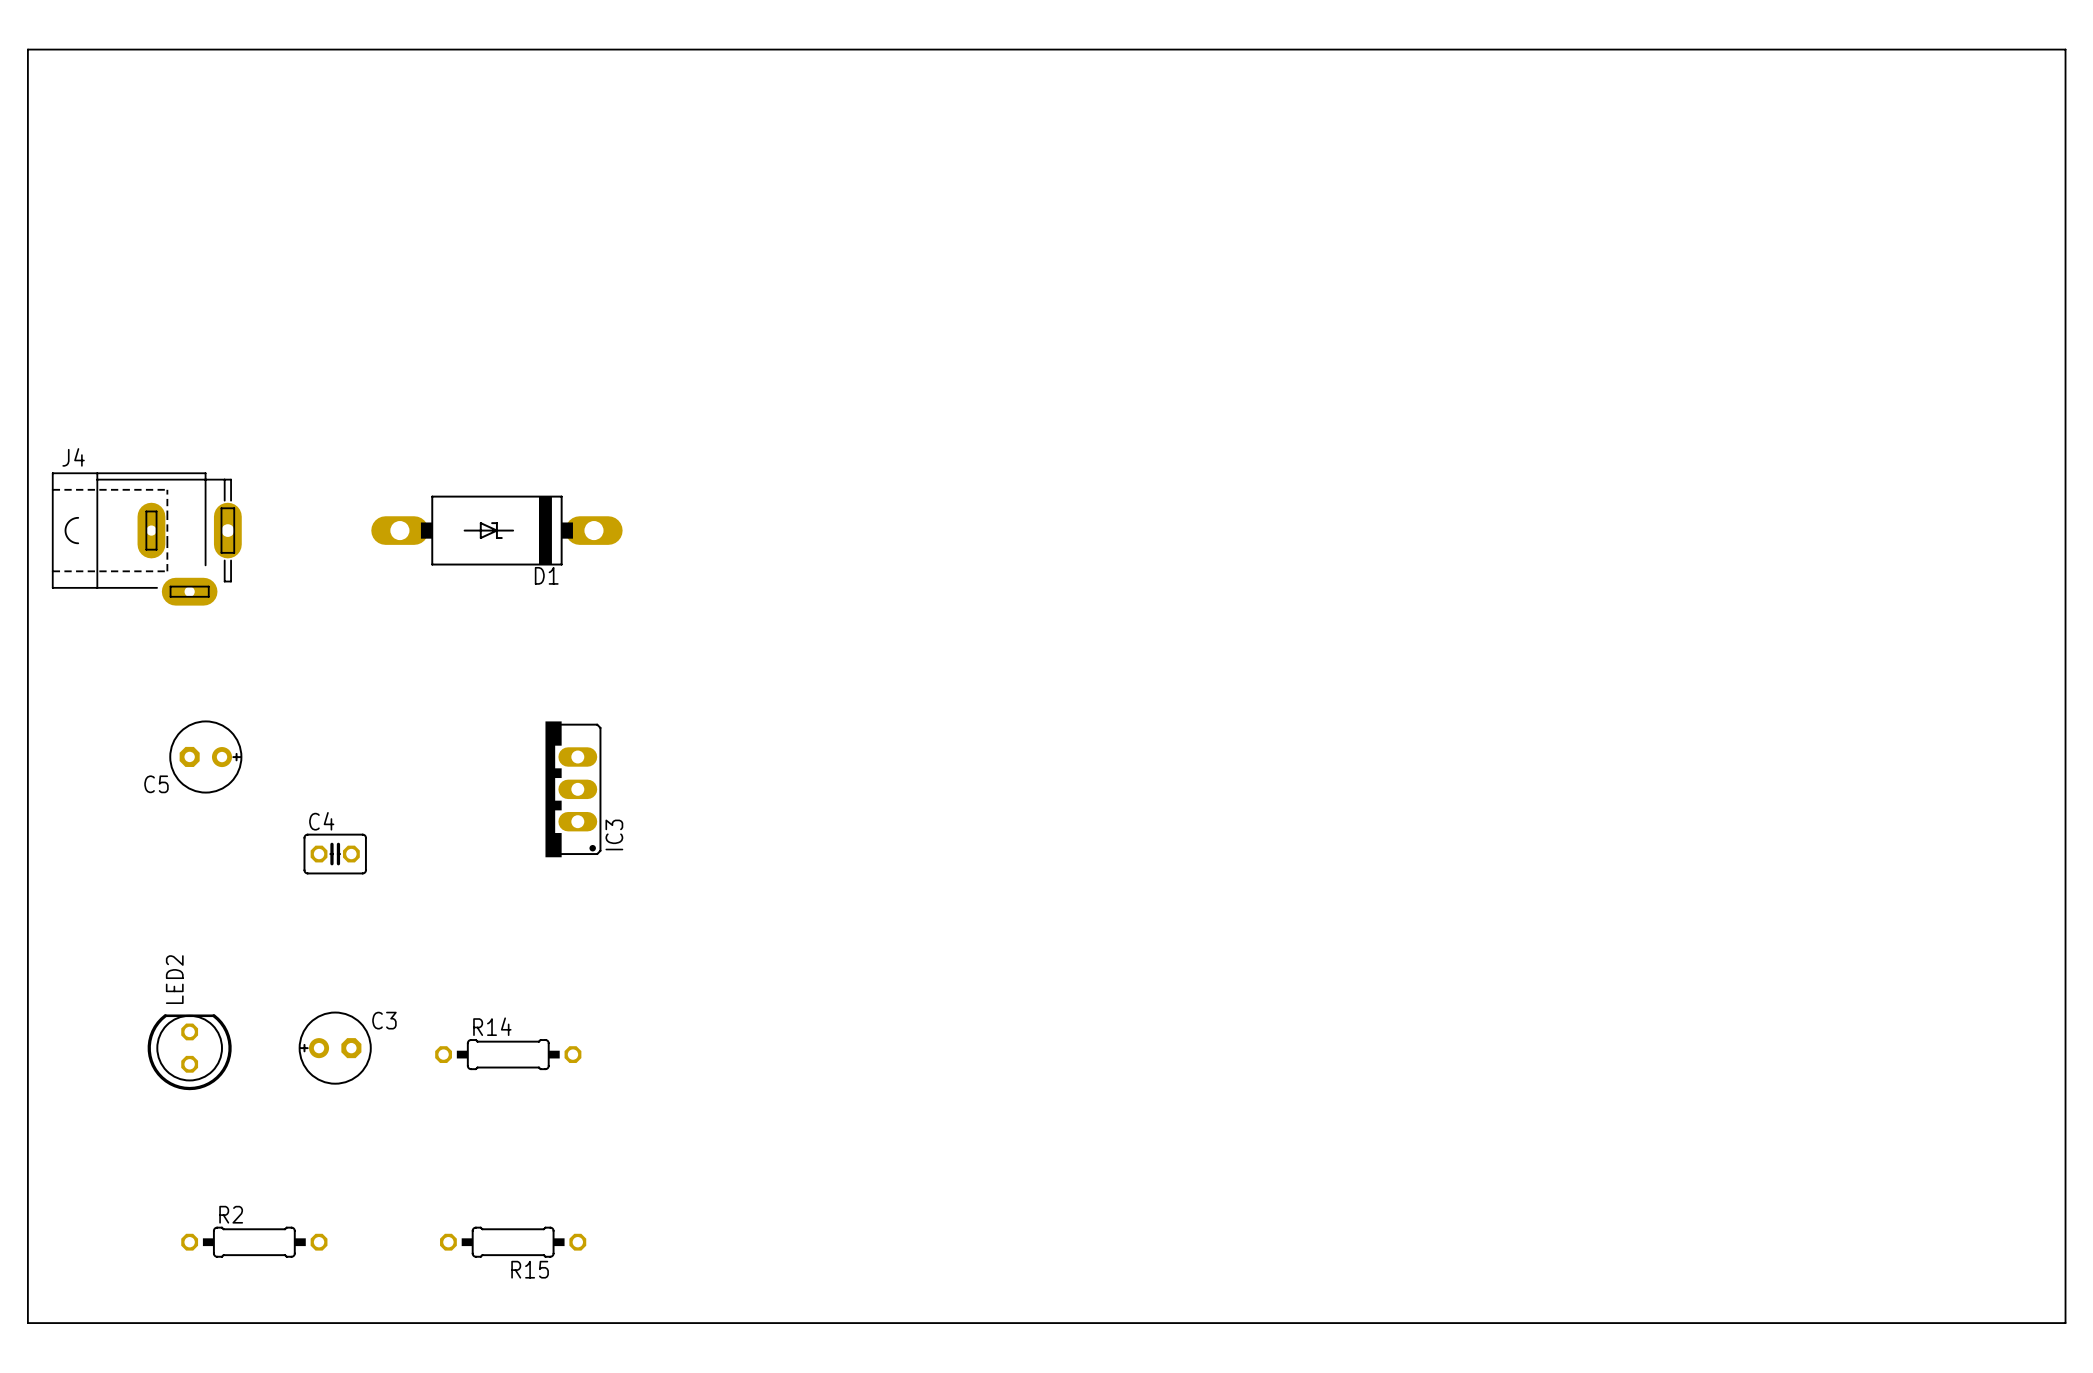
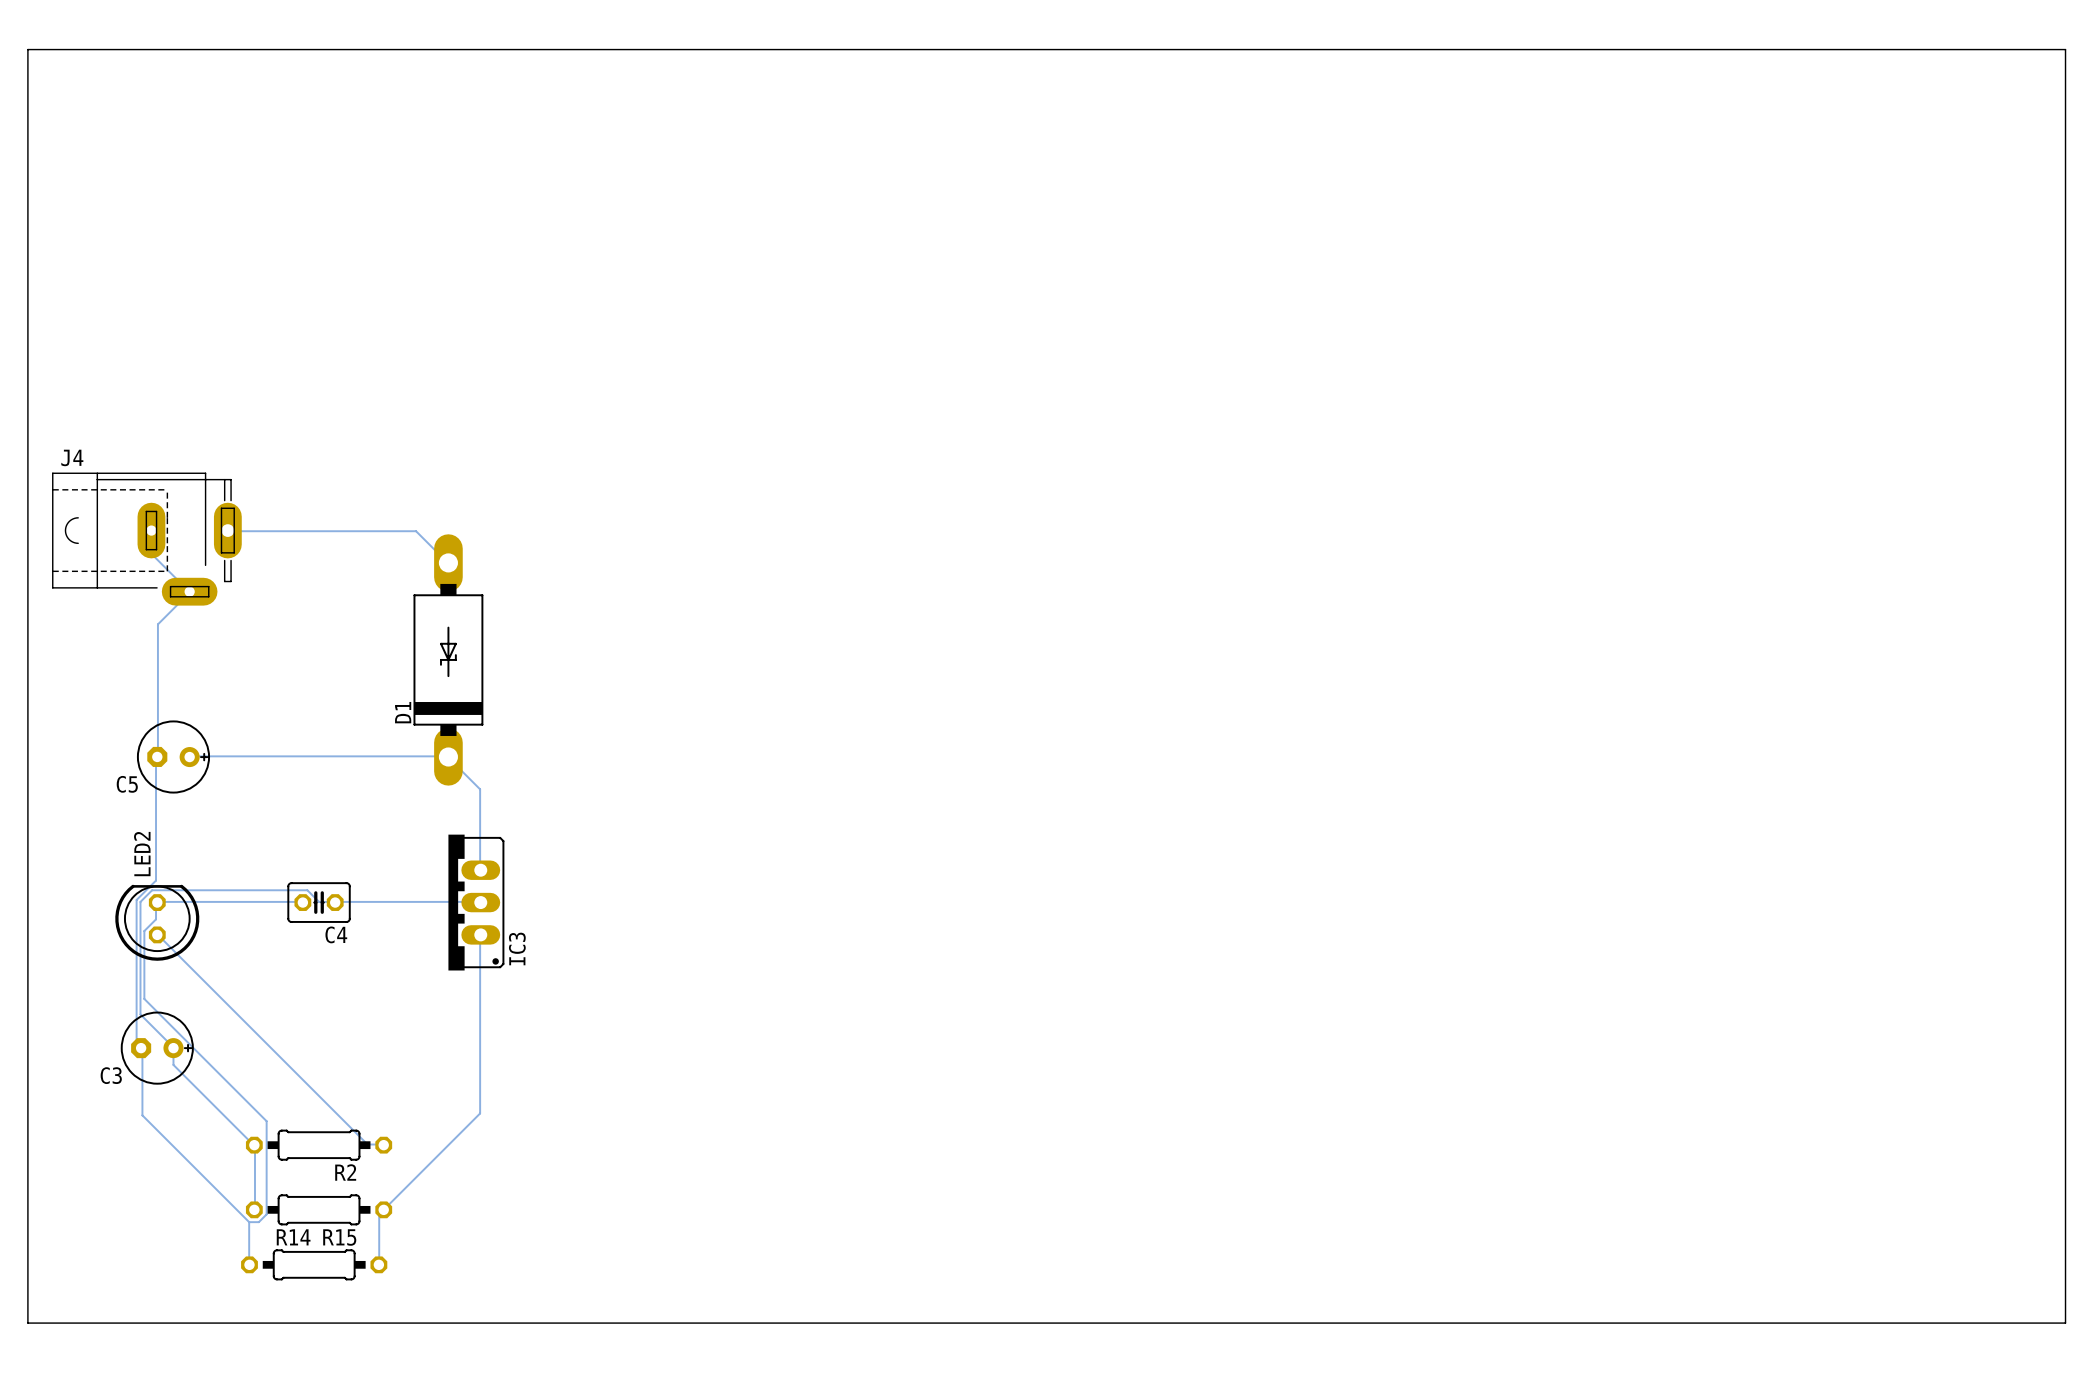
bottom track: none -> (151, 530) (152, 554) (189, 591) (157, 624) (156, 880) (136, 899) (136, 1043) (142, 1049) (142, 1115) (249, 1222)
bottom track: none -> (227, 530) (416, 531) (448, 562)
D1 rotation: 0° (496, 530) -> 90° clockwise (448, 659)
bottom track: none -> (189, 757) (447, 756) (480, 789) (480, 870)
C5 position: (205, 757) -> (173, 757)
IC3 position: (573, 789) -> (476, 902)
C4 name position: C4 (321, 821) -> C4 (336, 934)
C4 position: (335, 854) -> (319, 902)
bottom track: none -> (302, 902) (157, 901) (156, 903) (156, 919) (144, 931) (144, 998) (266, 1121) (266, 1214) (258, 1222) (249, 1222)
bottom track: none -> (480, 902) (319, 901) (307, 890) (152, 890) (140, 901) (140, 1014) (173, 1047) (173, 1064) (254, 1145) (254, 1209)
bottom track: none -> (157, 934) (367, 1144) (383, 1145)
bottom track: none -> (480, 934) (480, 1113) (379, 1214) (378, 1264)
C3 rotation: 0° (335, 1048) -> 180° (157, 1048)
C3 position: (335, 1048) -> (157, 1048)
LED2 position: (189, 1052) -> (157, 922)
R14 position: (508, 1054) -> (314, 1264)
R2 name position: R2 (231, 1214) -> R2 (345, 1172)
bottom track: none -> (249, 1222) (249, 1264)
R2 position: (254, 1242) -> (319, 1145)
R15 position: (513, 1242) -> (319, 1209)

